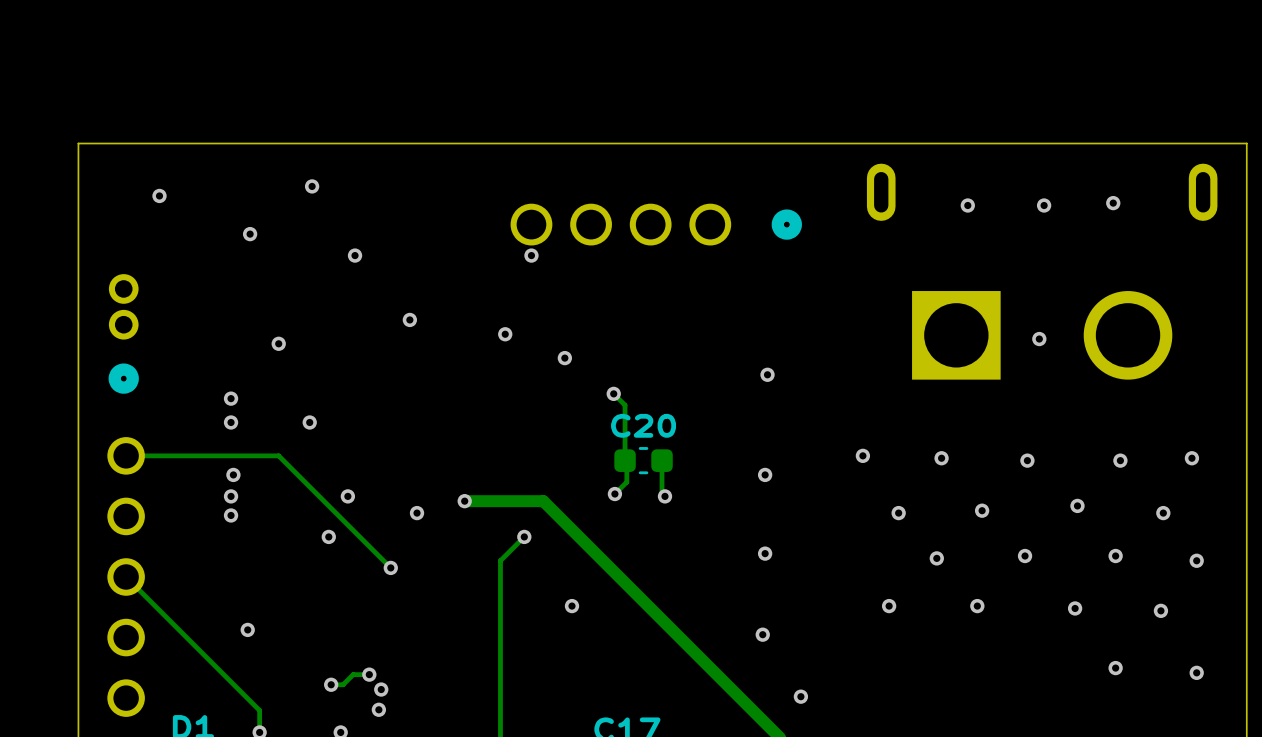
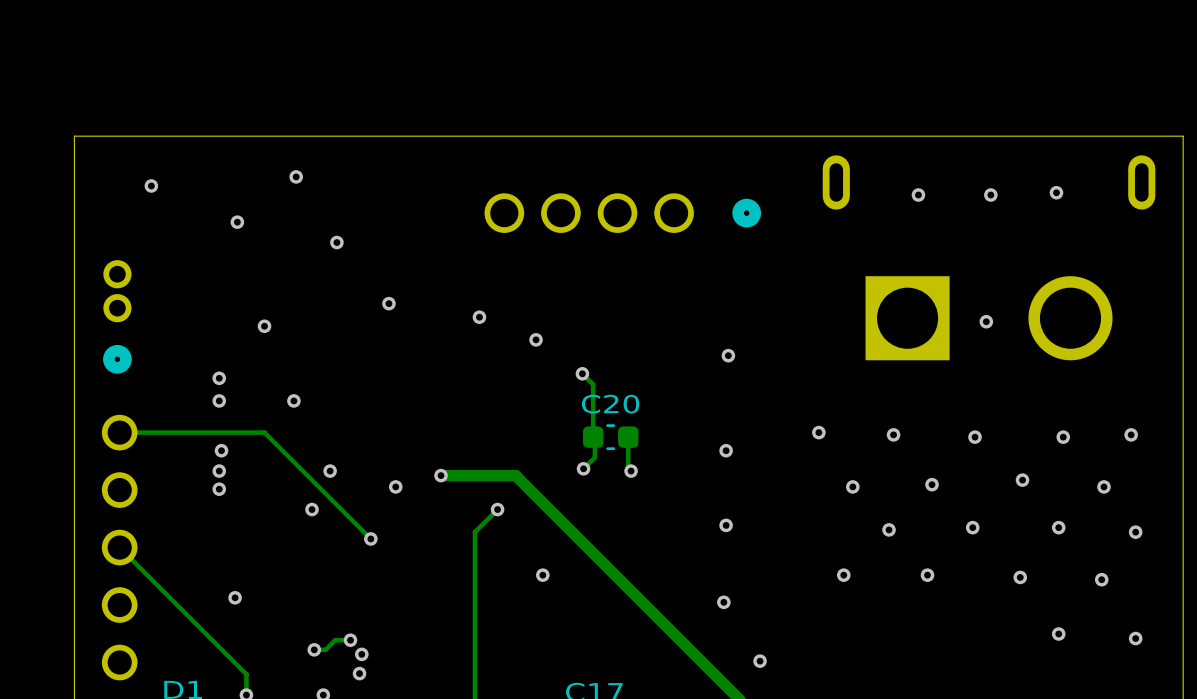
via: (531, 255) -> none

